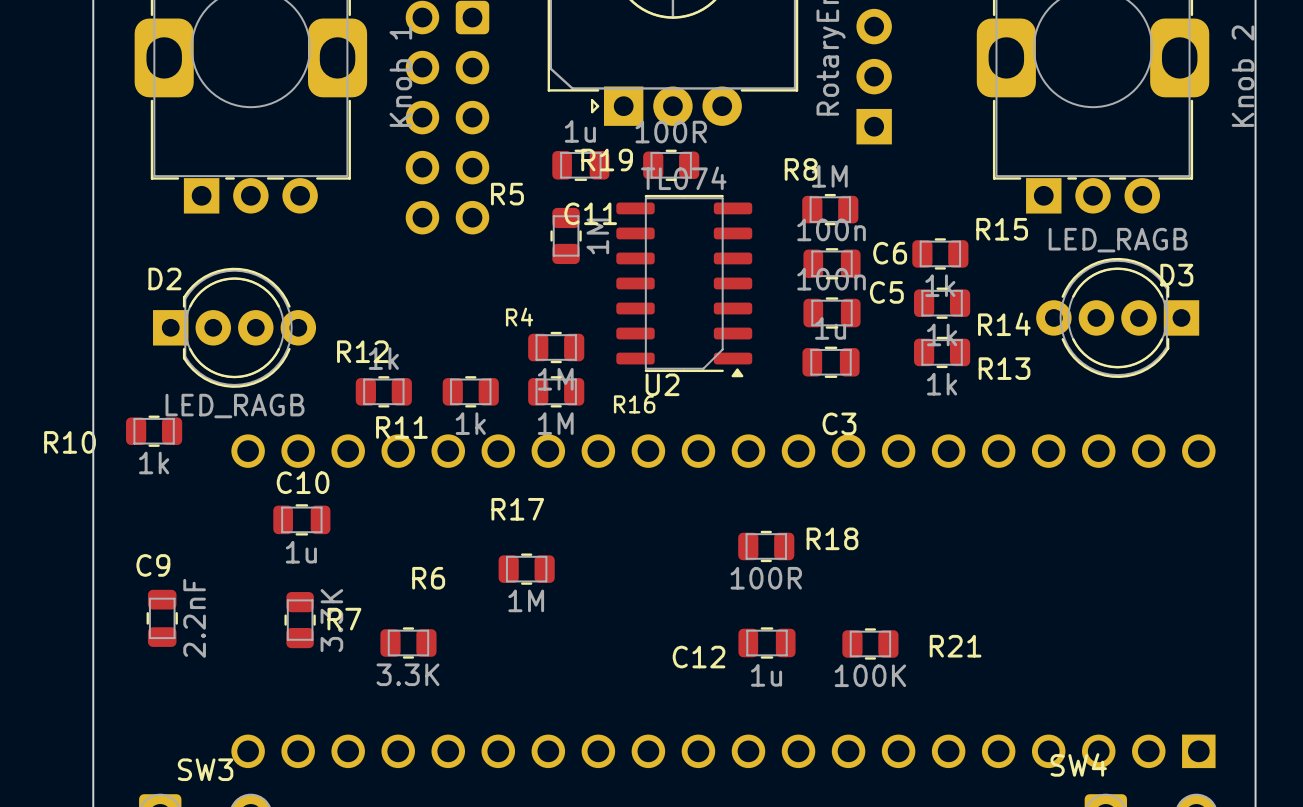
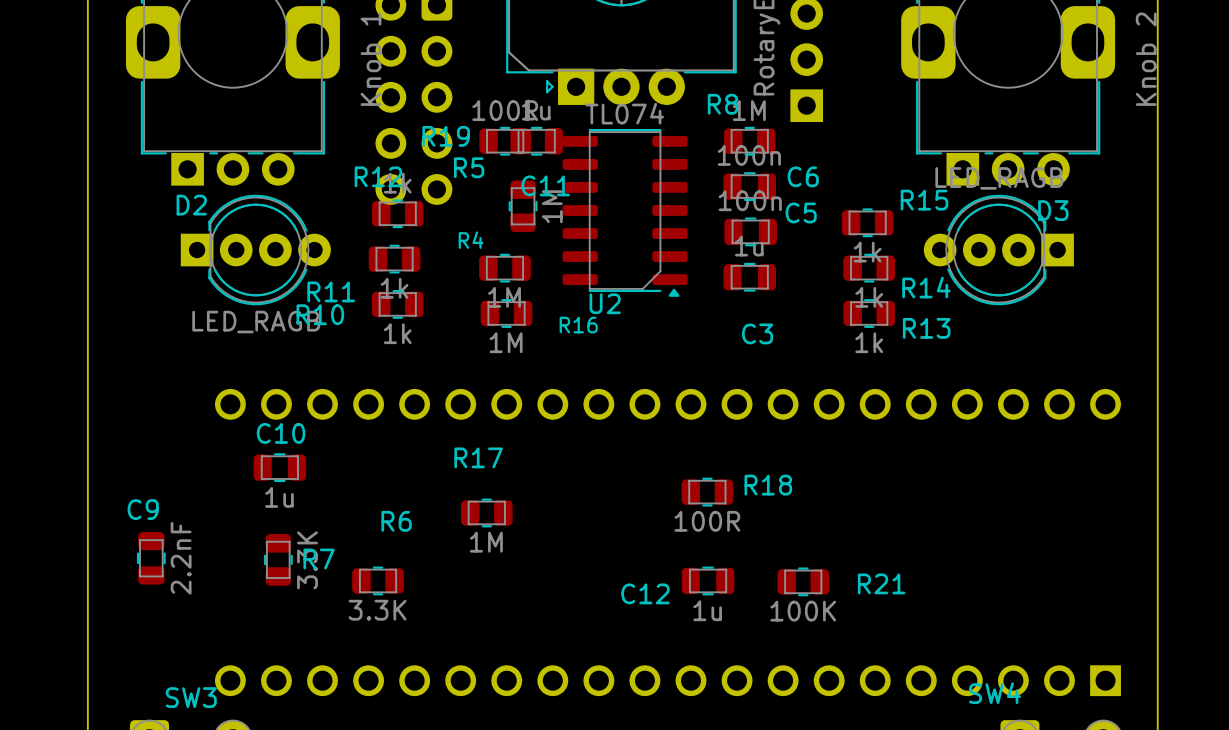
R19 position: (671, 165) -> (505, 141)
R8 position: (830, 209) -> (749, 141)
C6 position: (832, 263) -> (749, 186)
U2 position: (684, 286) -> (625, 212)
C5 position: (832, 313) -> (750, 231)
D3 position: (1117, 317) -> (998, 250)
D2 position: (234, 327) -> (255, 250)
R4 position: (556, 347) -> (504, 268)
C3 position: (831, 362) -> (749, 277)
R12 position: (383, 391) -> (397, 213)
R11 position: (470, 391) -> (394, 259)
R16 position: (556, 391) -> (506, 313)
R10 position: (154, 431) -> (397, 304)

